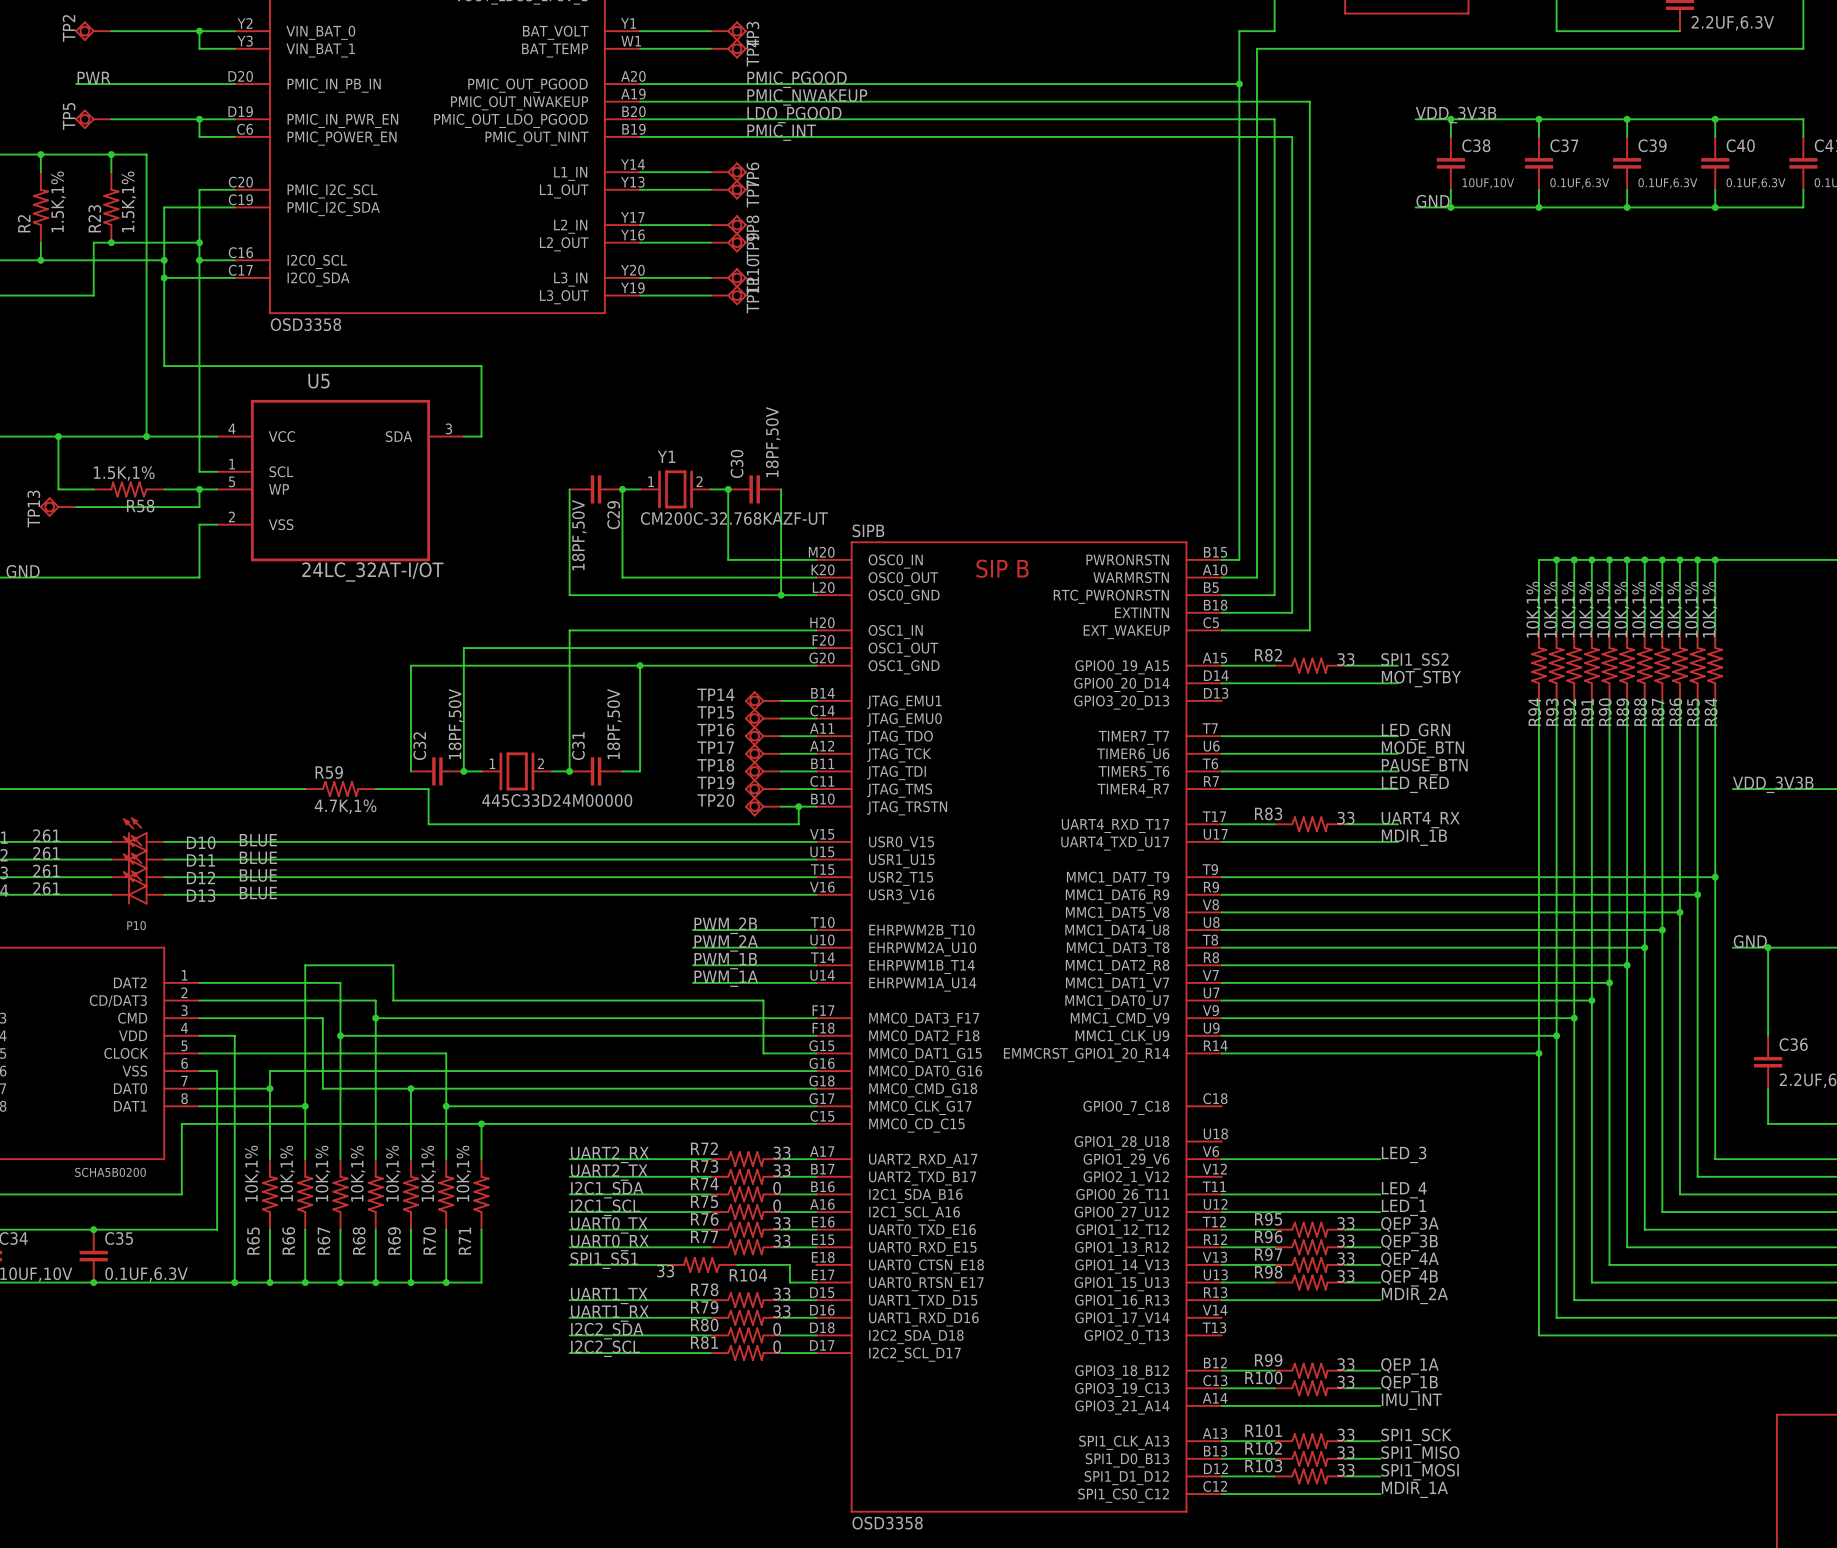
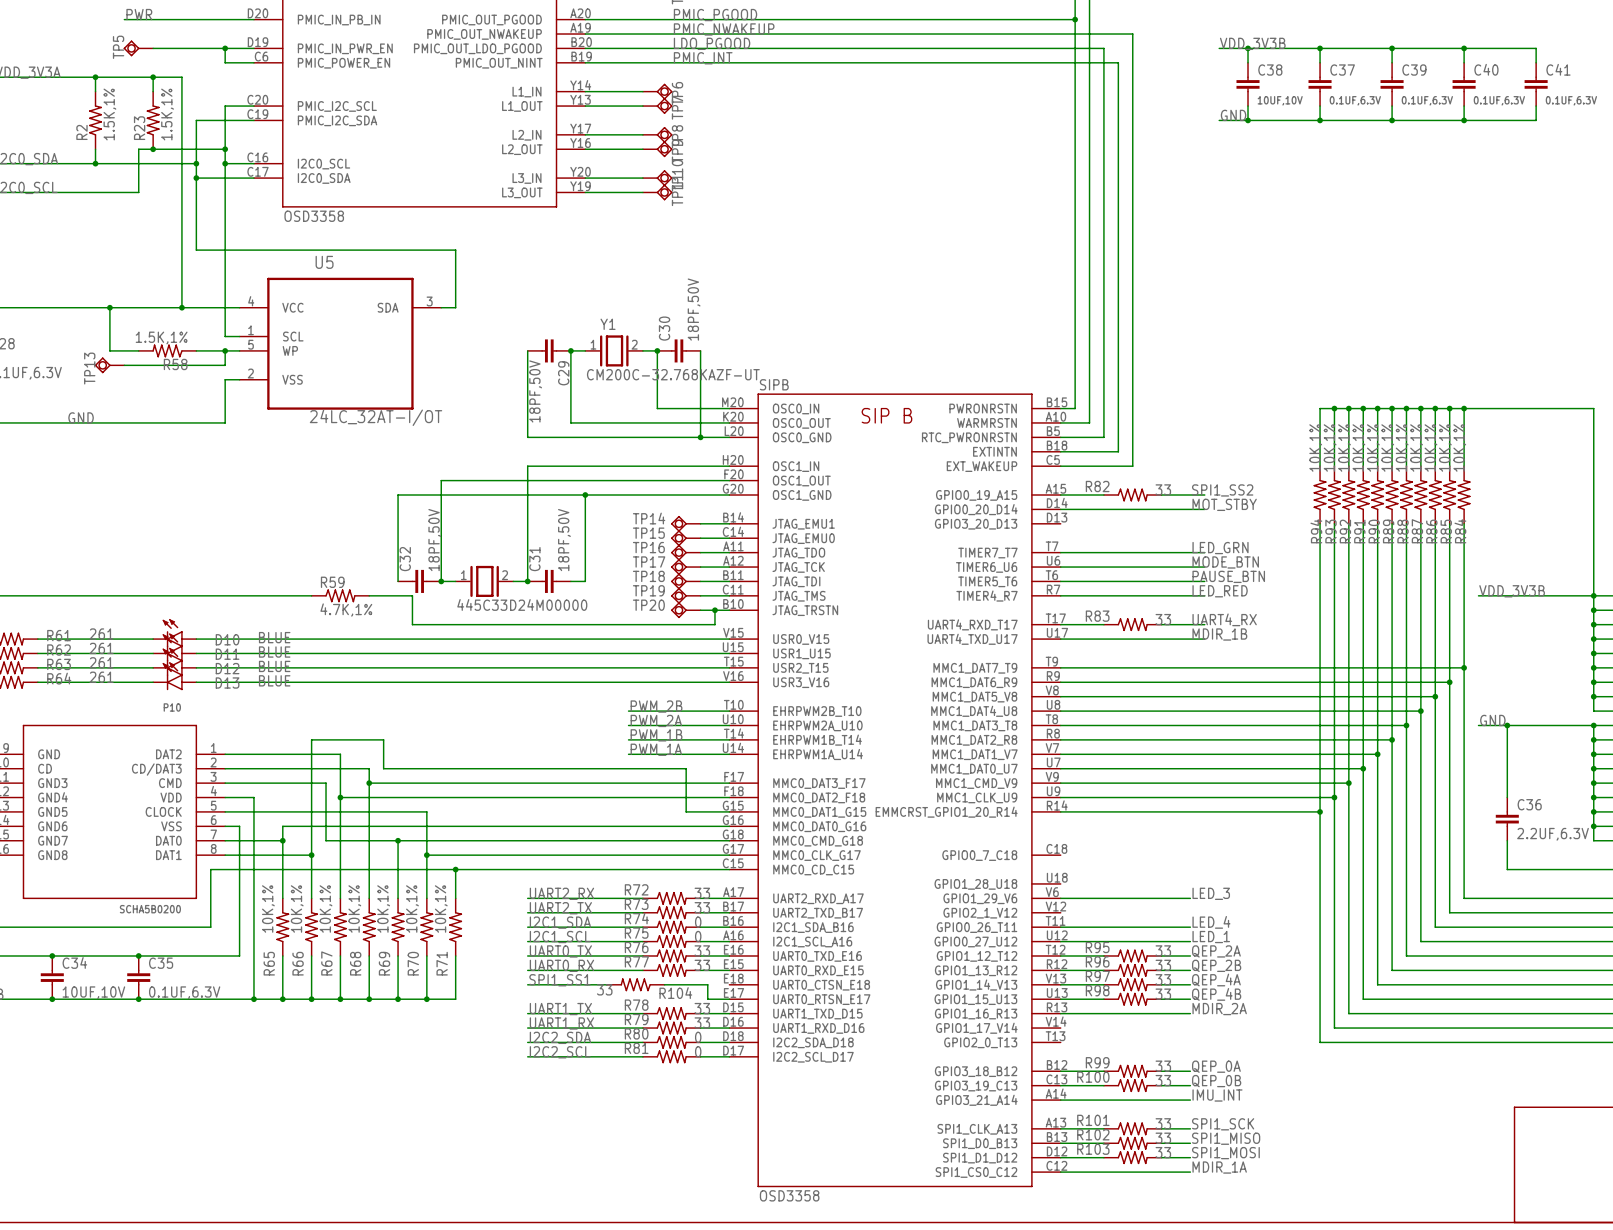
label: QEP_3A (1409, 1225) -> QEP_2A (1216, 951)
label: QEP_3B (1409, 1243) -> QEP_2B (1216, 965)
label: QEP_1A (1409, 1366) -> QEP_0A (1216, 1066)
label: QEP_1B (1409, 1384) -> QEP_0B (1216, 1081)

